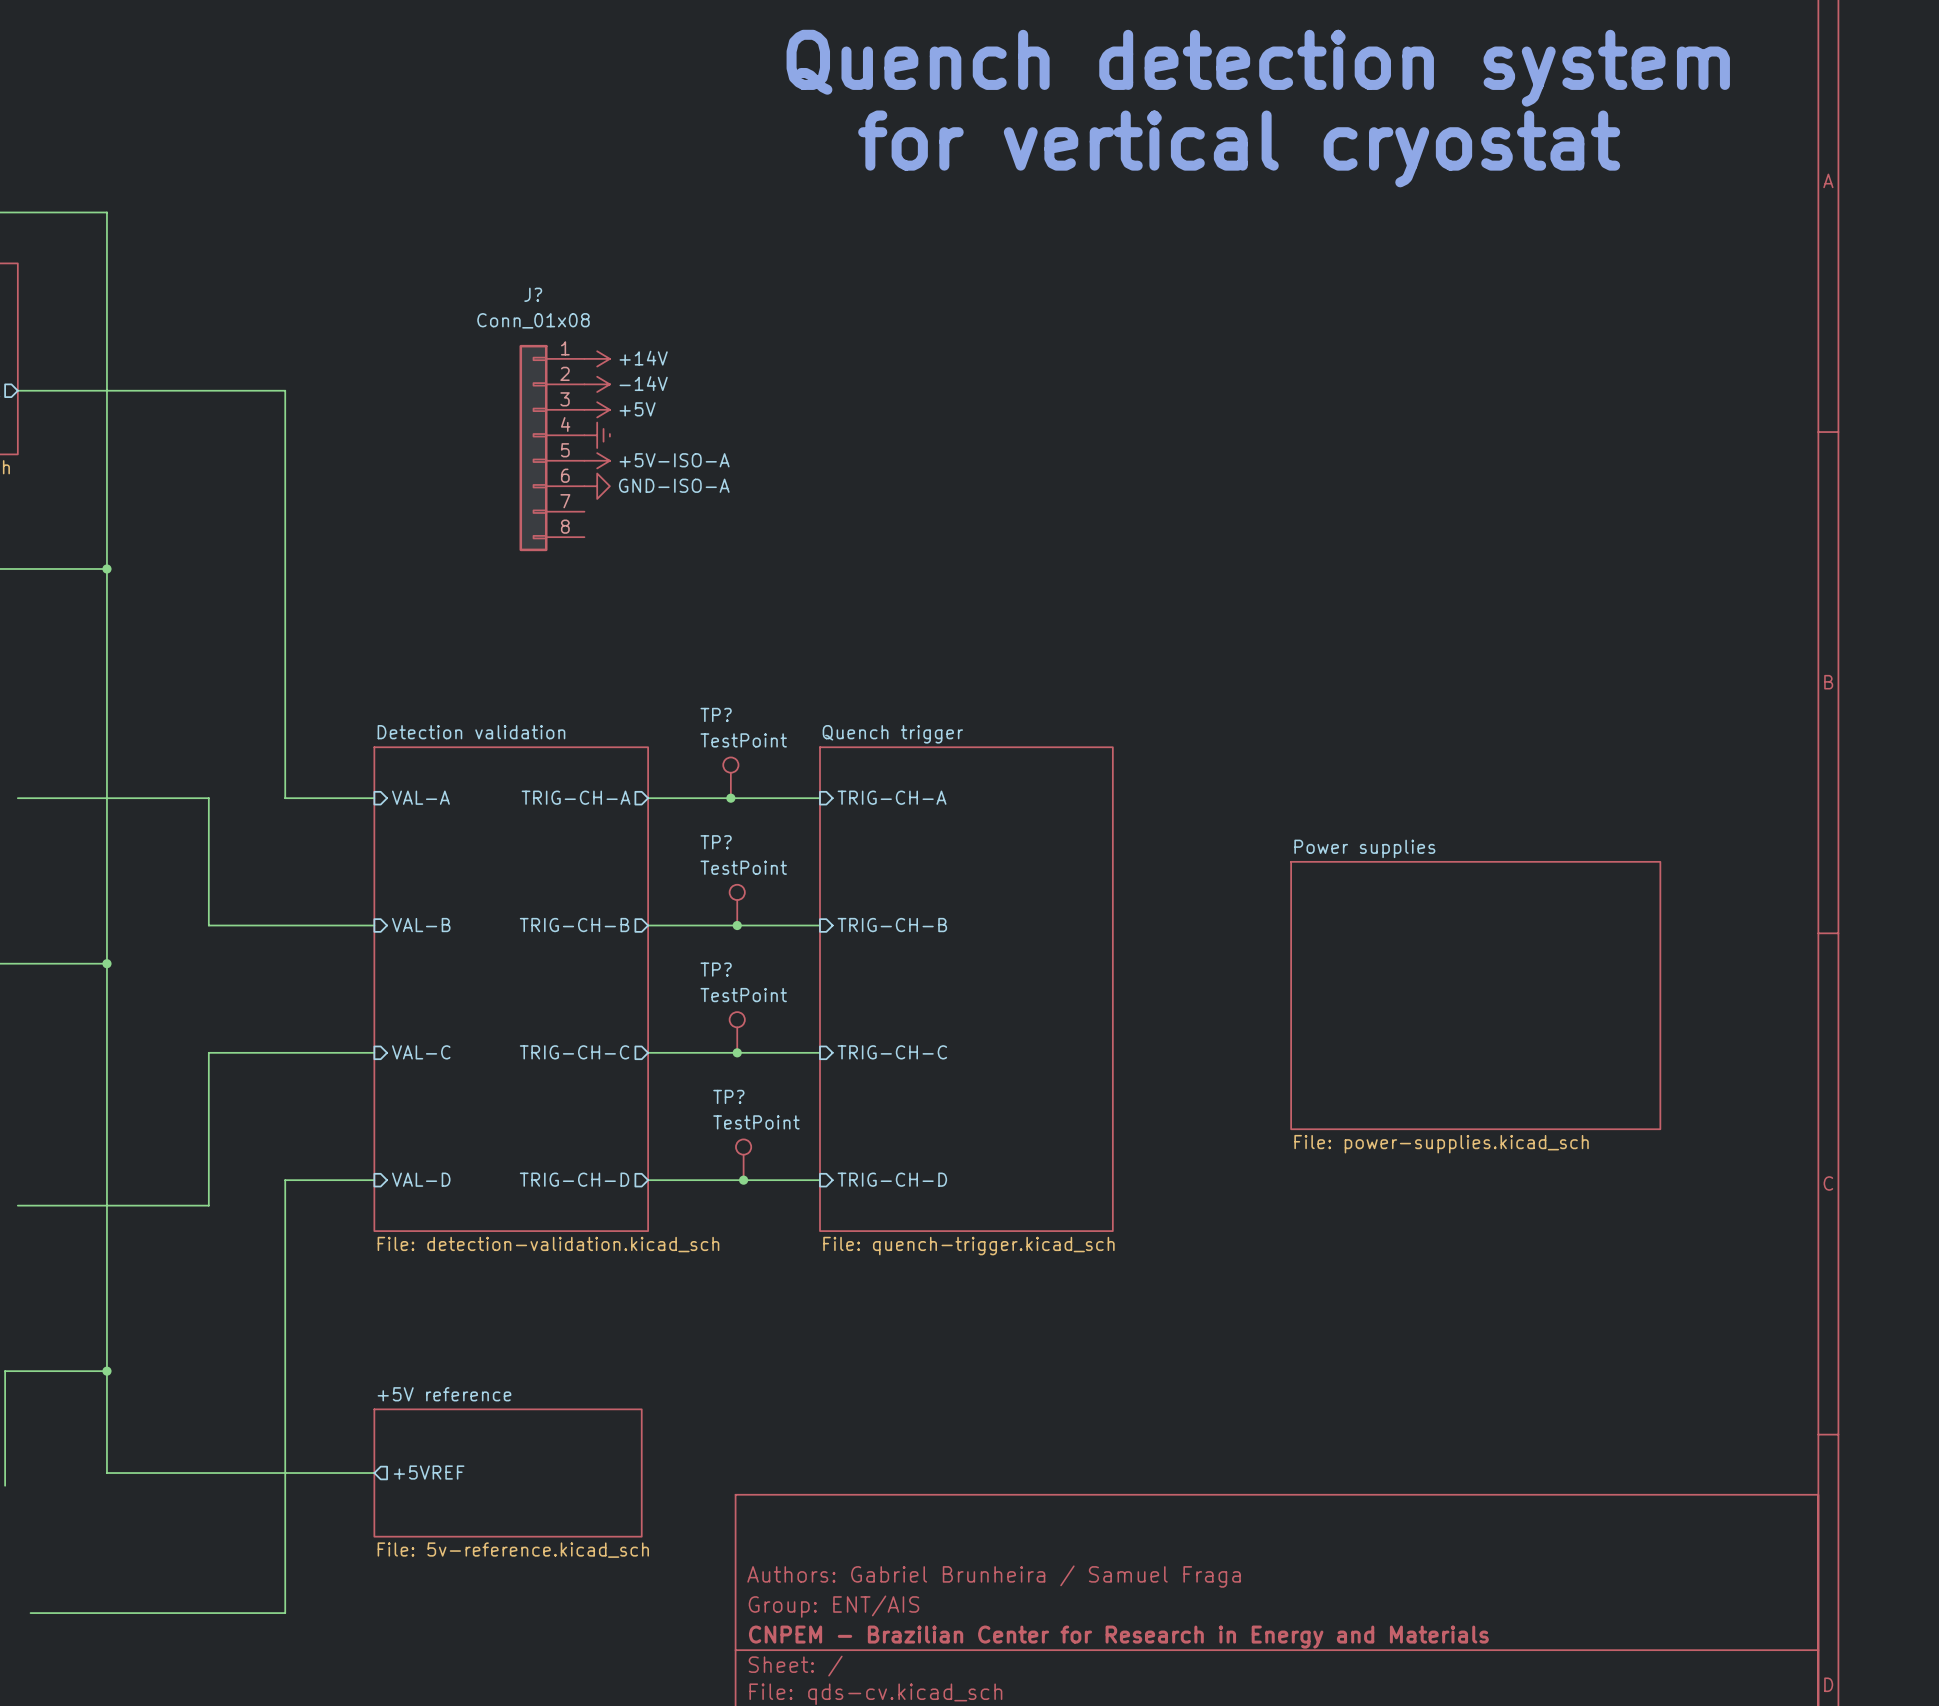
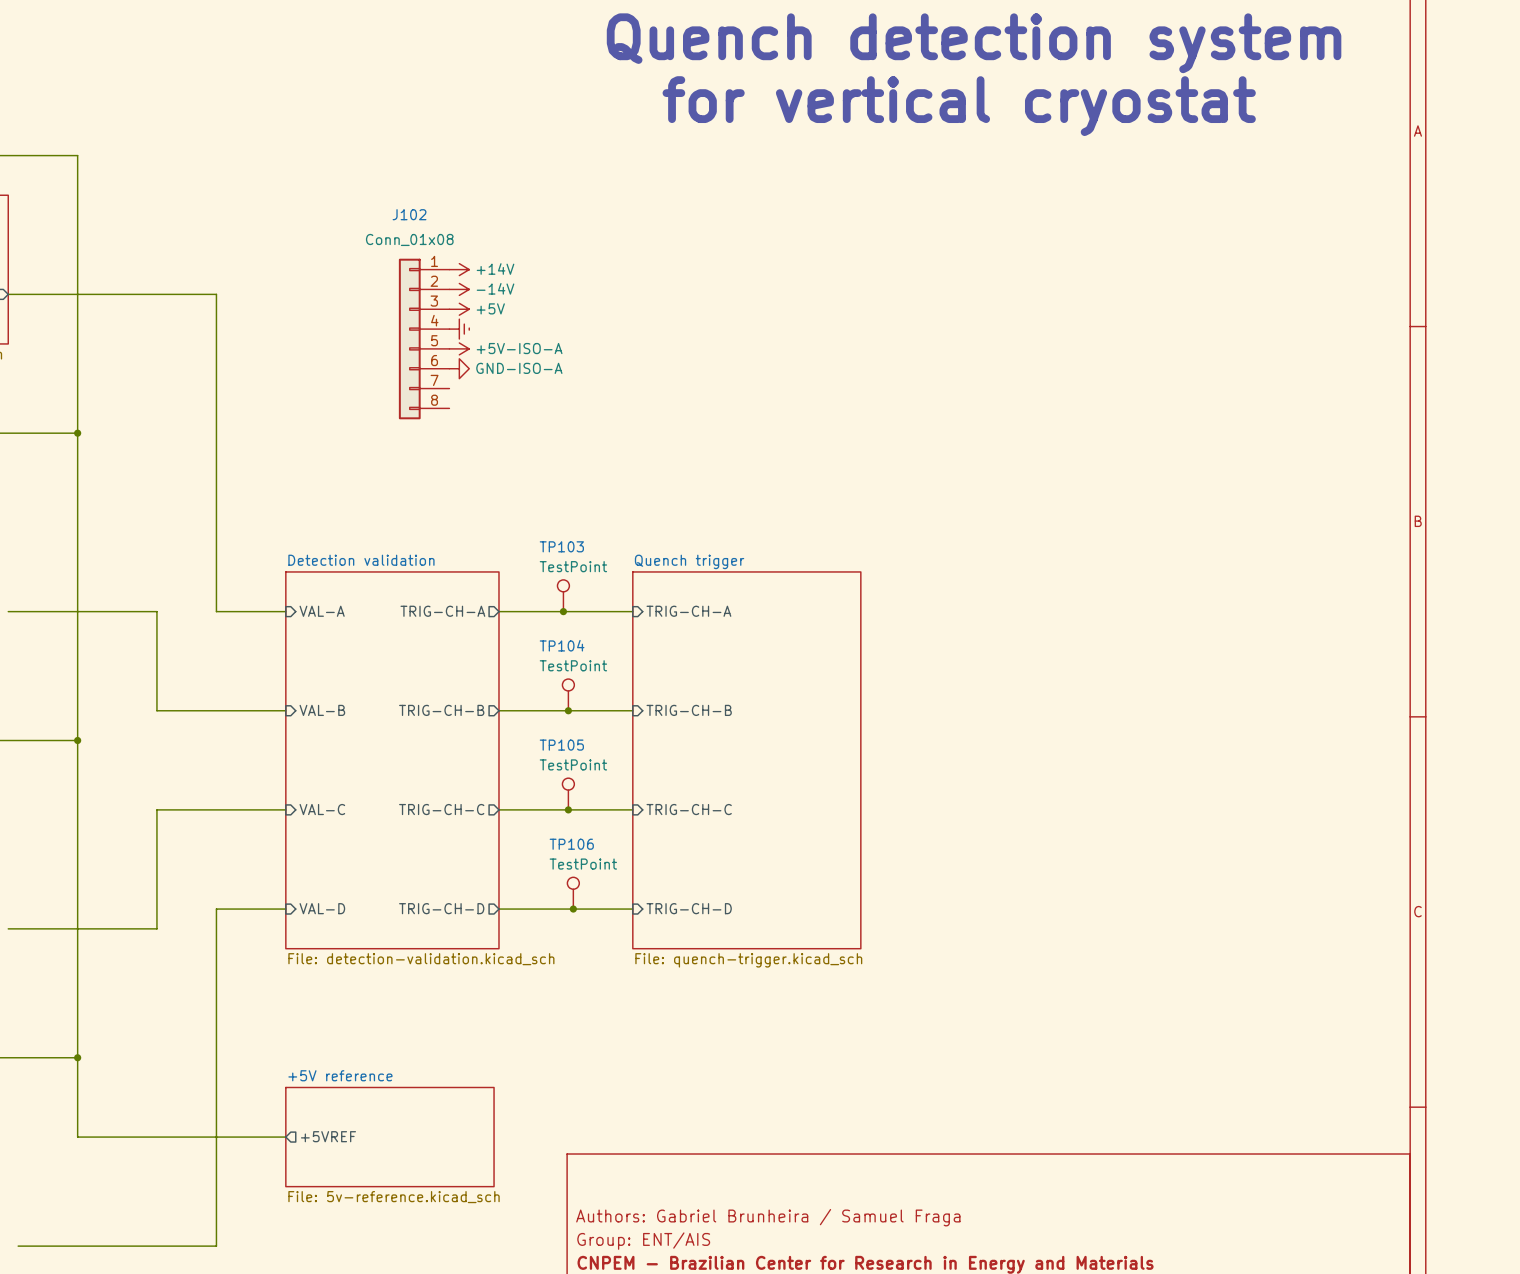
J? name: J? (533, 294) -> J102 (409, 214)
TP? name: TP? (716, 714) -> TP103 (561, 546)
TP? name: TP? (716, 842) -> TP104 (562, 645)
TP? name: TP? (716, 969) -> TP105 (561, 745)
sheet Power supplies: File: power-supplies.kicad_sch (1475, 995) -> none
TP? name: TP? (728, 1096) -> TP106 (571, 844)

